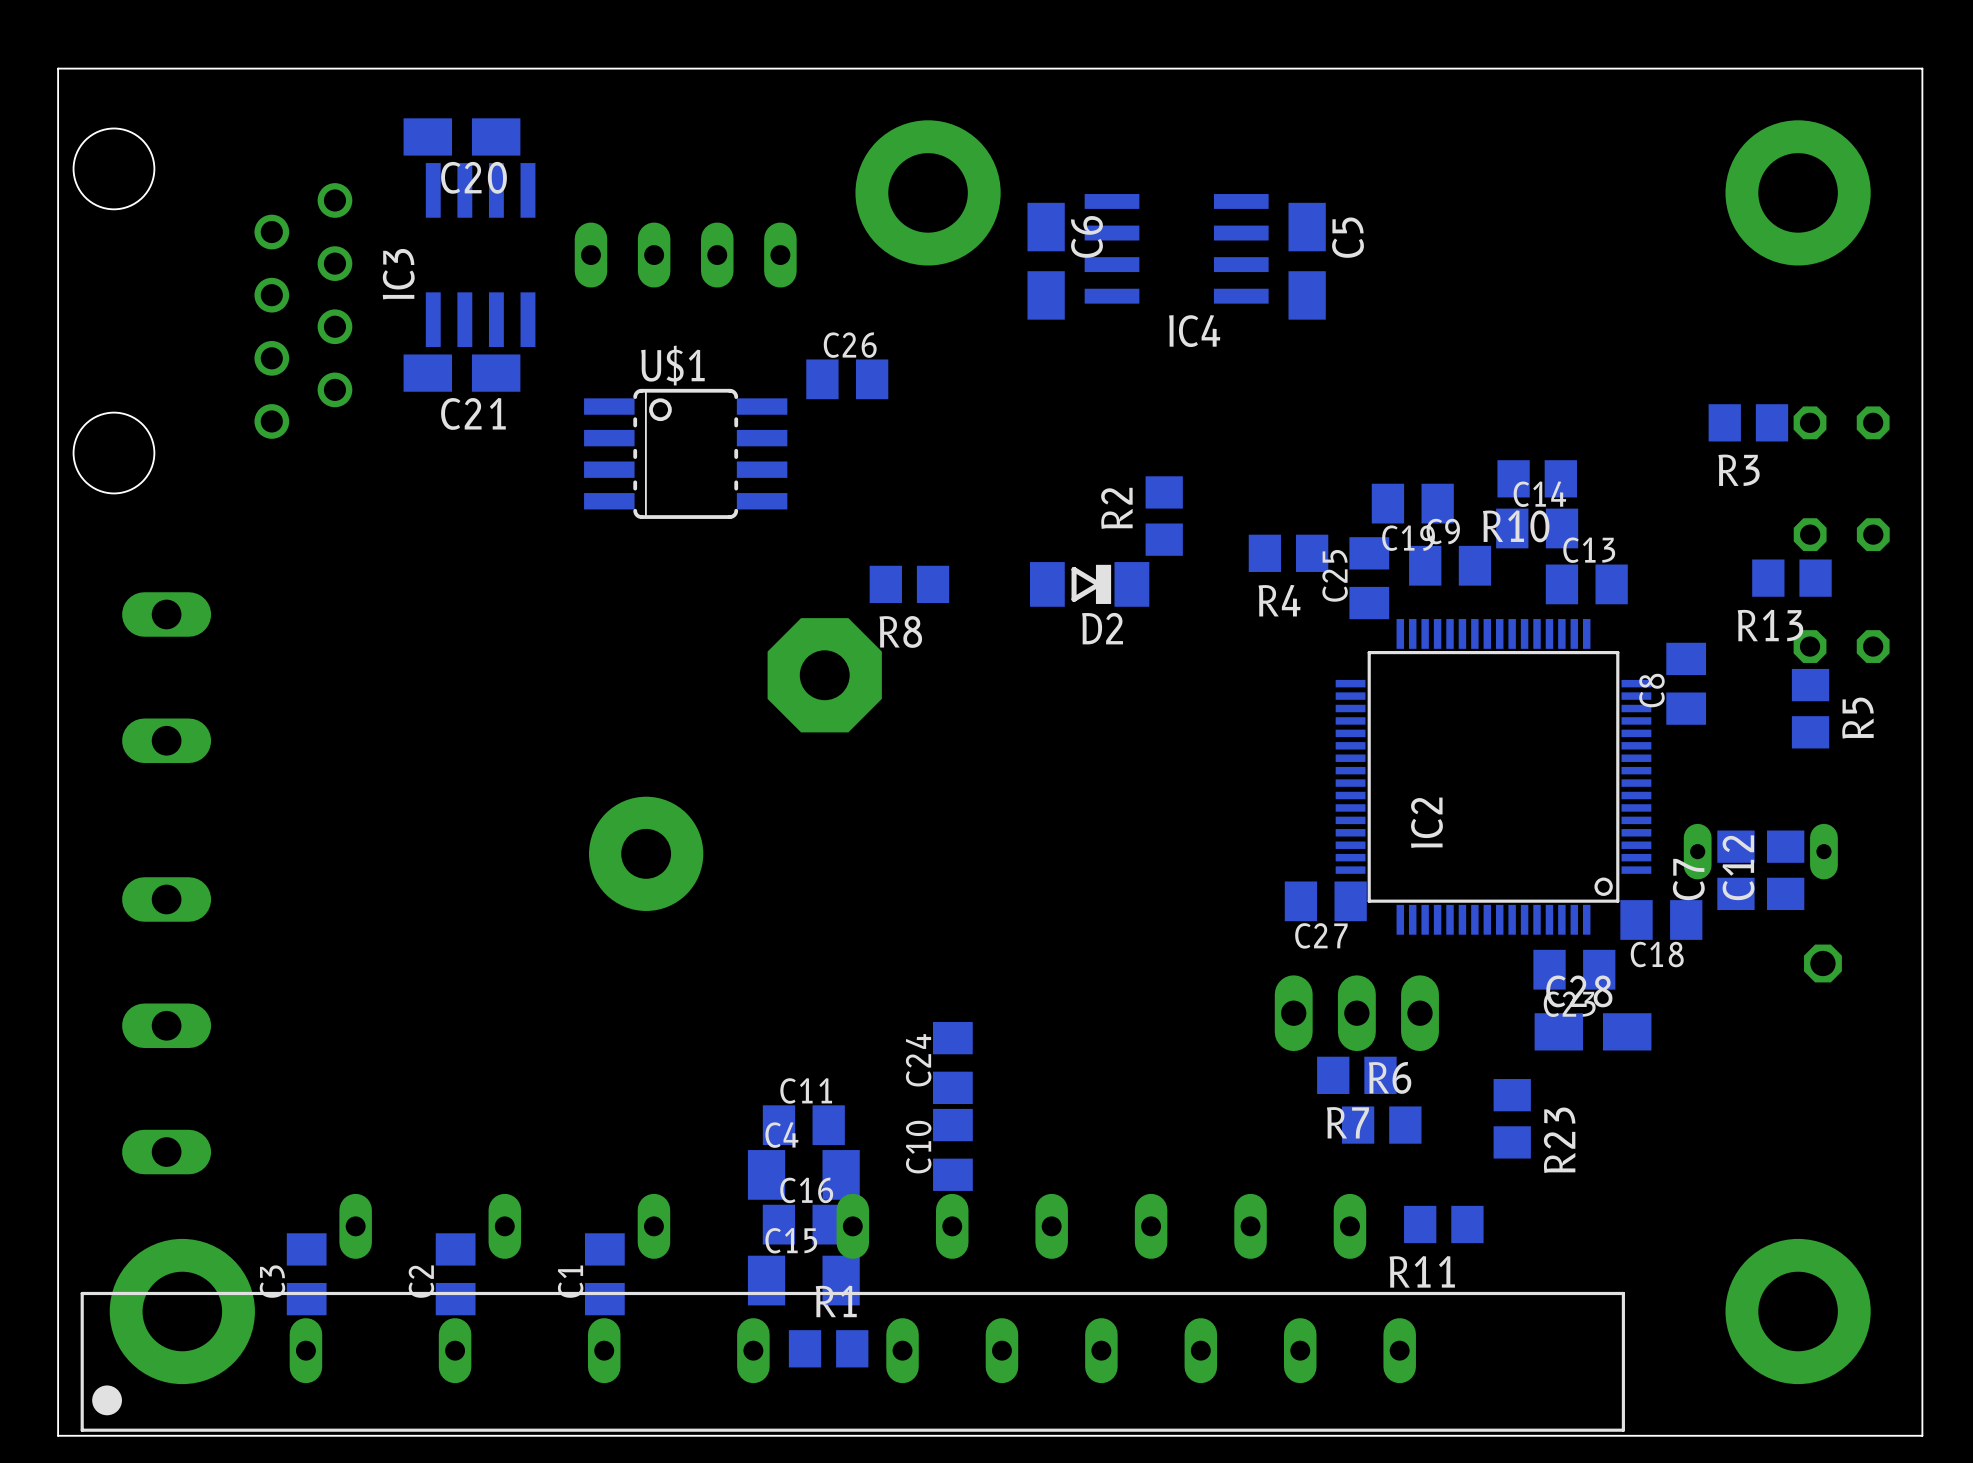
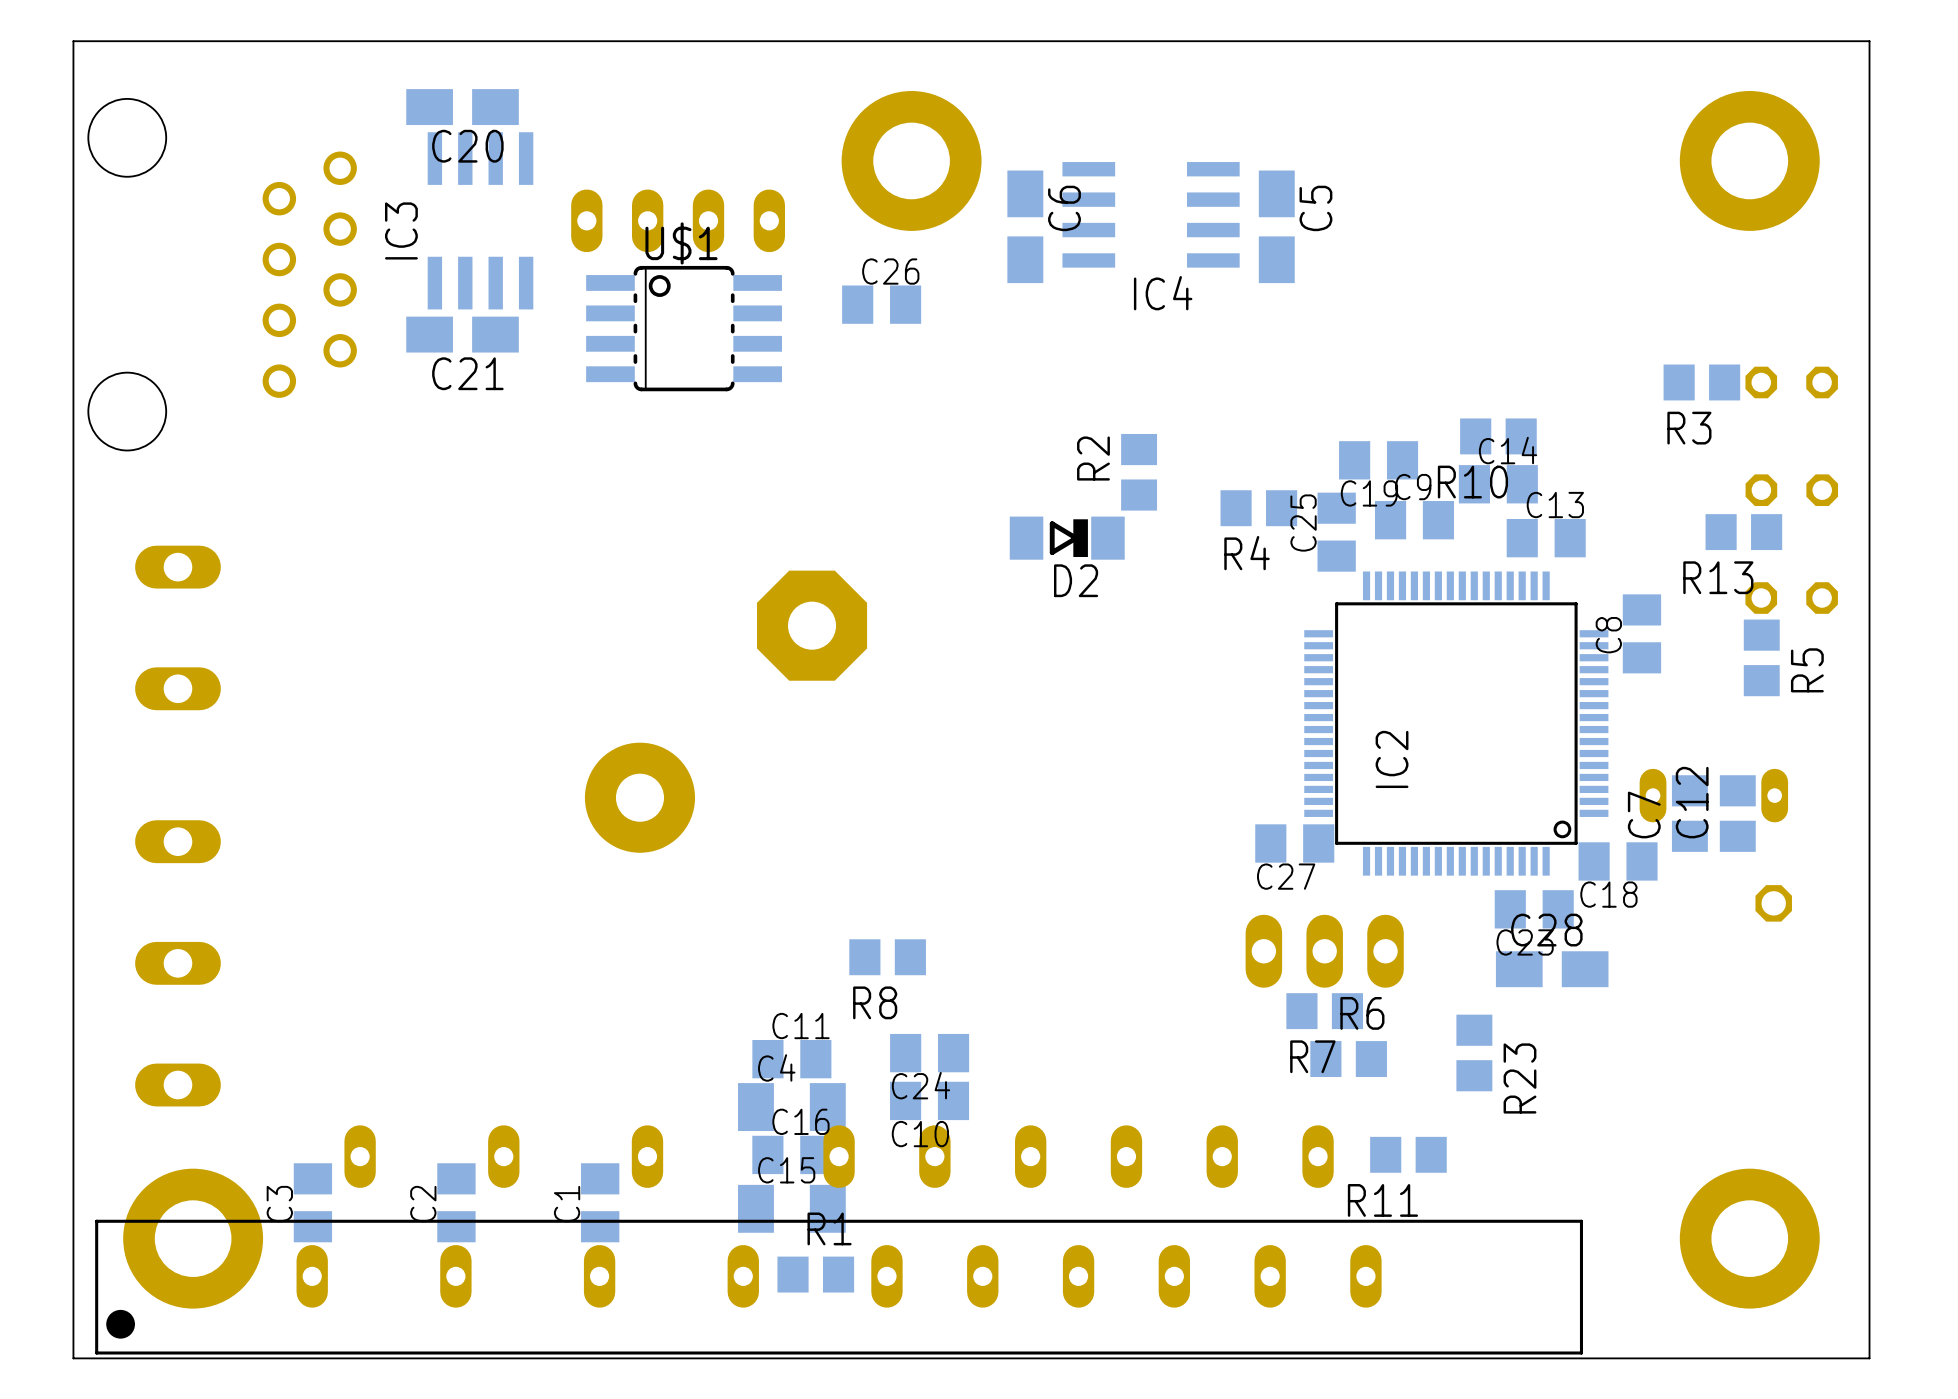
C26 position: (847, 379) -> (881, 304)
U$1 position: (685, 453) -> (684, 328)
R8 position: (909, 584) -> (887, 957)
C24 name position: C24 (918, 1060) -> C24 (920, 1085)
C24 rotation: 0° (952, 1062) -> 90° clockwise (929, 1053)
C24 position: (952, 1062) -> (929, 1053)
C10 name position: C10 (918, 1147) -> C10 (920, 1134)
C10 rotation: 0° (952, 1149) -> 90° clockwise (929, 1100)

